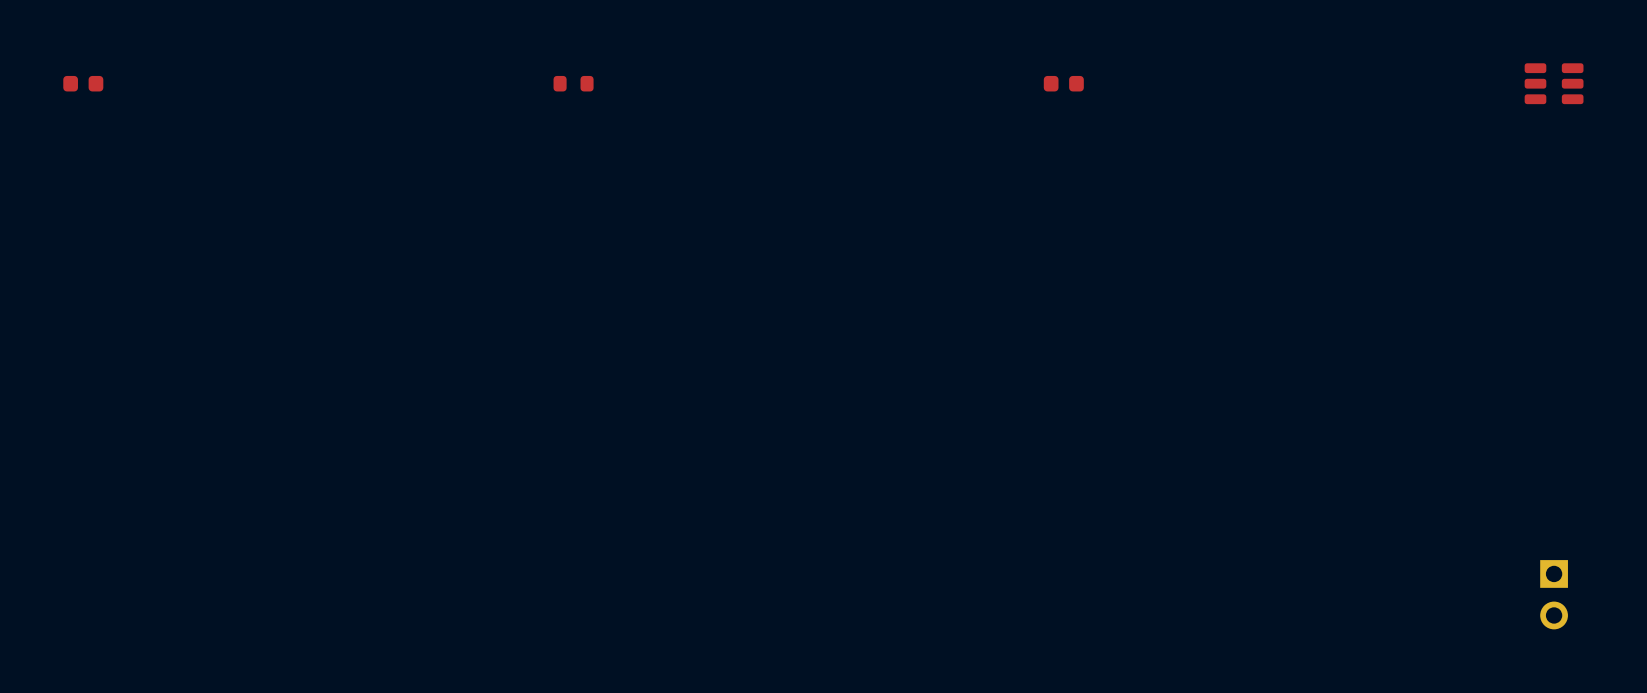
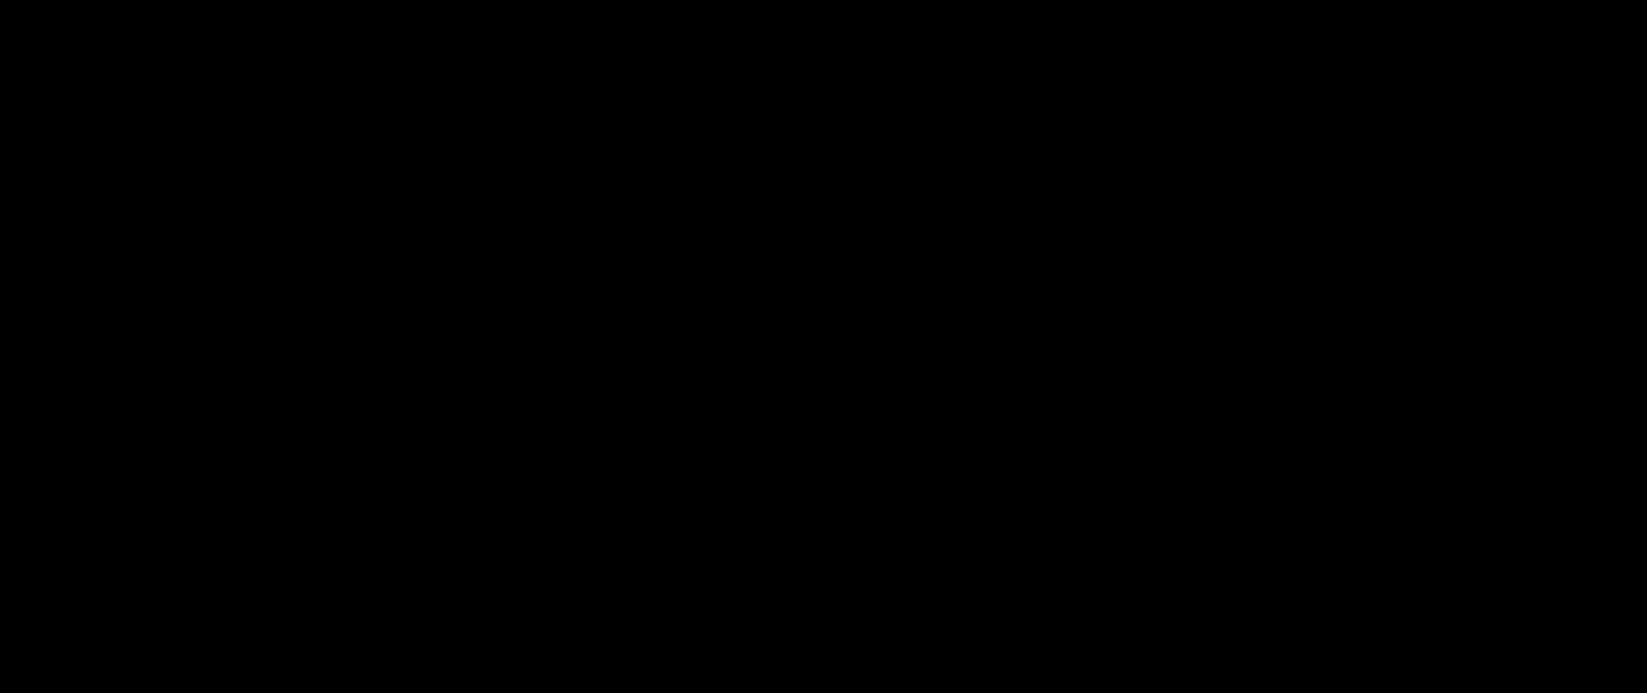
part: (83, 83) -> none
part: (573, 83) -> none
part: (1063, 83) -> none
part: (1554, 83) -> none
part: (1554, 594) -> none

